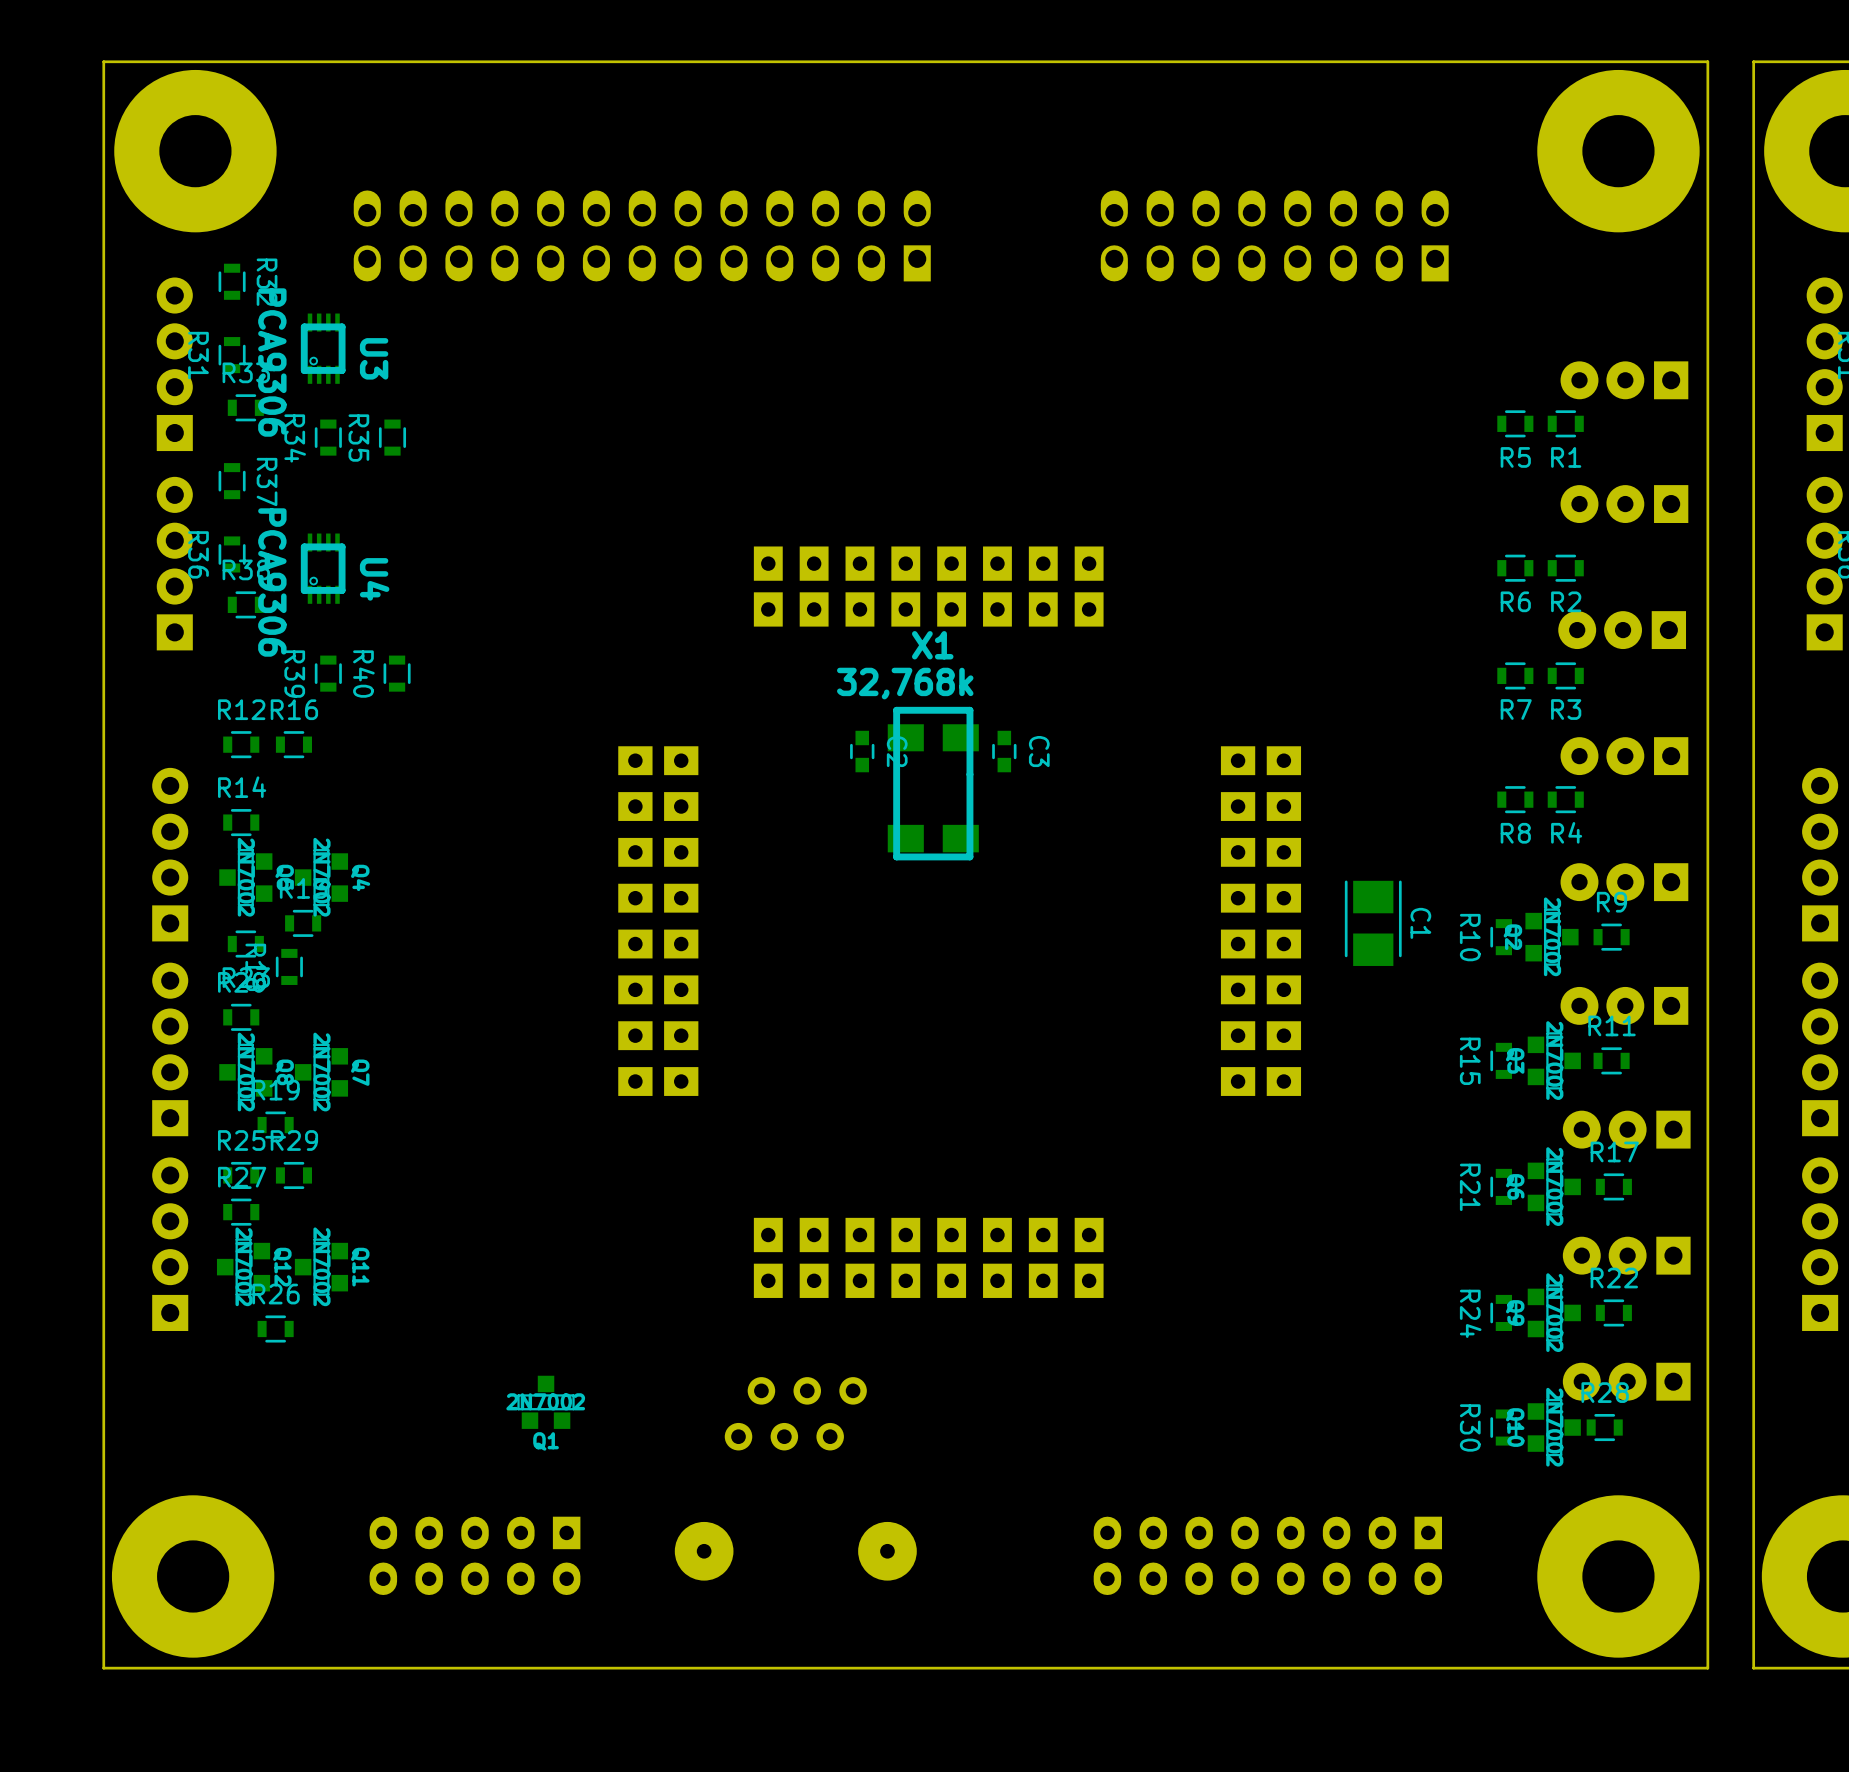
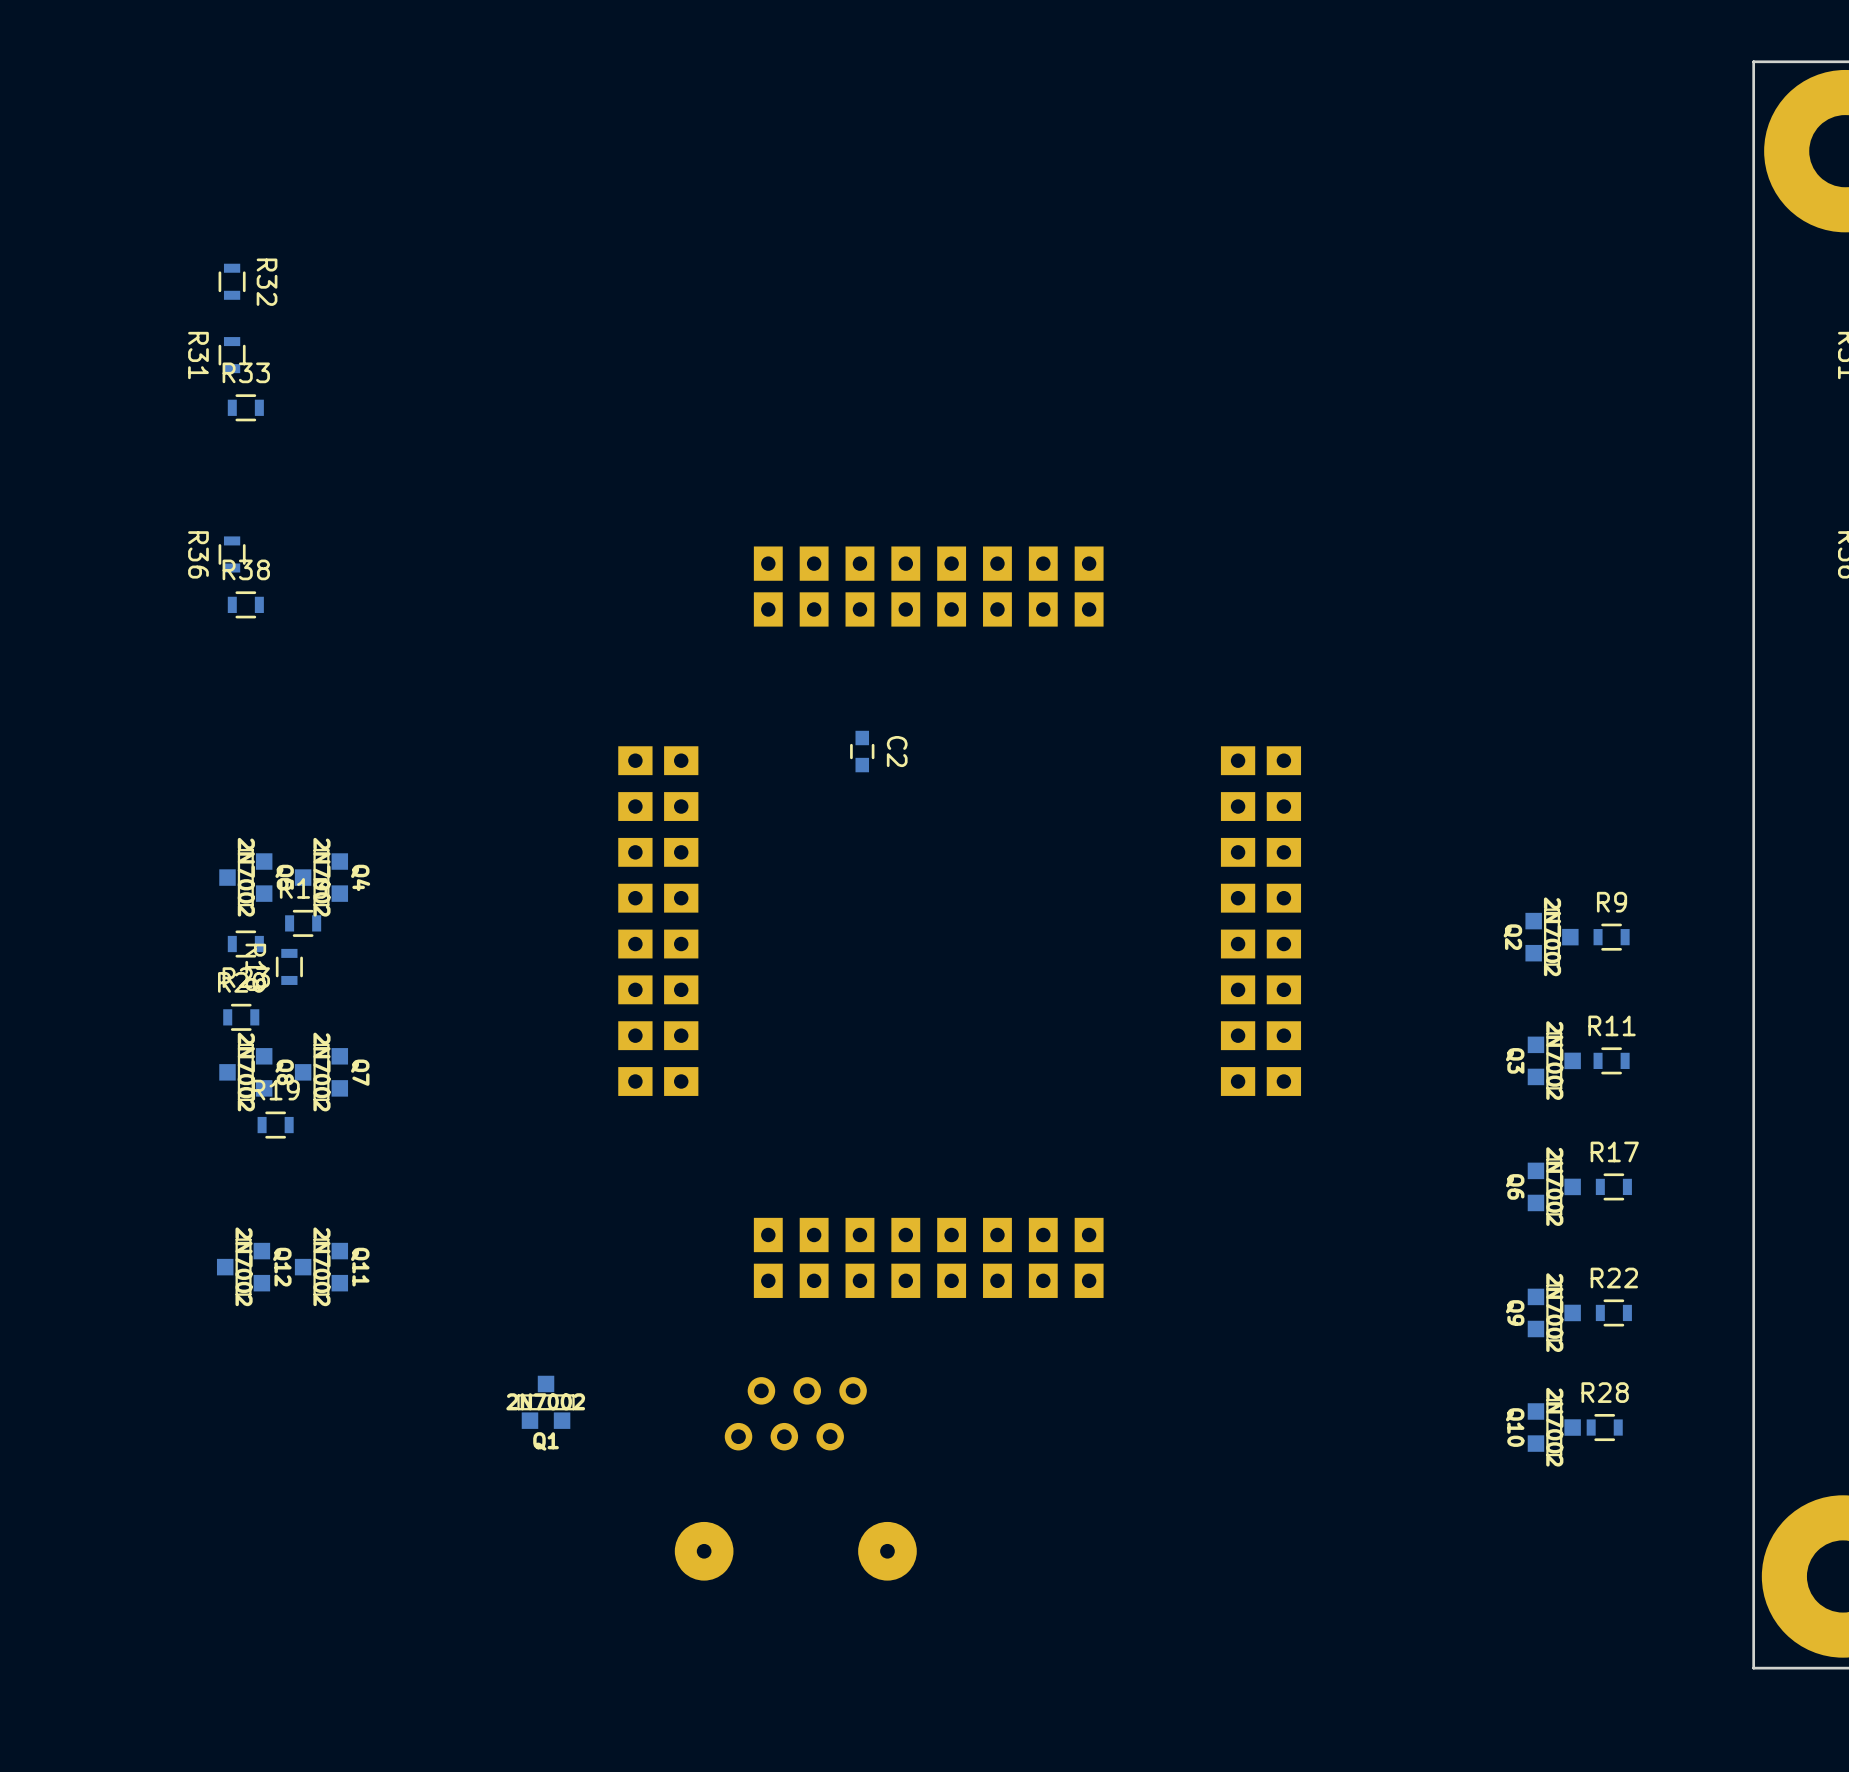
board edge: (1707, 61) (1707, 1668) (103, 1668) (103, 61) (1707, 61) -> none
part: (195, 151) -> none
part: (1618, 151) -> none
part: (642, 235) -> none
part: (1274, 235) -> none
U3: PCA9306 (323, 348) -> none
part: (174, 364) -> none
part: (1824, 364) -> none
part: (1624, 380) -> none
R5: (1515, 423) -> none
R1: (1565, 423) -> none
R34: (328, 437) -> none
R35: (392, 437) -> none
R37: (232, 481) -> none
part: (1624, 504) -> none
part: (174, 563) -> none
part: (1824, 563) -> none
U4: PCA9306 (323, 568) -> none
R6: (1515, 568) -> none
R2: (1565, 568) -> none
part: (1622, 630) -> none
R39: (328, 673) -> none
R40: (397, 673) -> none
R7: (1515, 675) -> none
R3: (1565, 675) -> none
R12: (241, 744) -> none
R16: (293, 744) -> none
C3: (1004, 751) -> none
part: (1624, 756) -> none
X1: 32,768k (933, 783) -> none
R8: (1515, 799) -> none
R4: (1565, 799) -> none
R14: (241, 822) -> none
part: (170, 854) -> none
part: (1820, 854) -> none
part: (1624, 882) -> none
C1: (1373, 923) -> none
R10: (1503, 937) -> none
part: (1624, 1005) -> none
part: (170, 1049) -> none
part: (1820, 1049) -> none
R15: (1503, 1060) -> none
part: (1626, 1129) -> none
R25: (241, 1175) -> none
R29: (293, 1175) -> none
R21: (1503, 1186) -> none
R27: (241, 1212) -> none
part: (170, 1244) -> none
part: (1820, 1244) -> none
part: (1626, 1255) -> none
R24: (1503, 1312) -> none
R26: (275, 1328) -> none
part: (1626, 1381) -> none
R30: (1503, 1427) -> none
part: (474, 1555) -> none
part: (1267, 1555) -> none
part: (193, 1576) -> none
part: (1618, 1576) -> none

